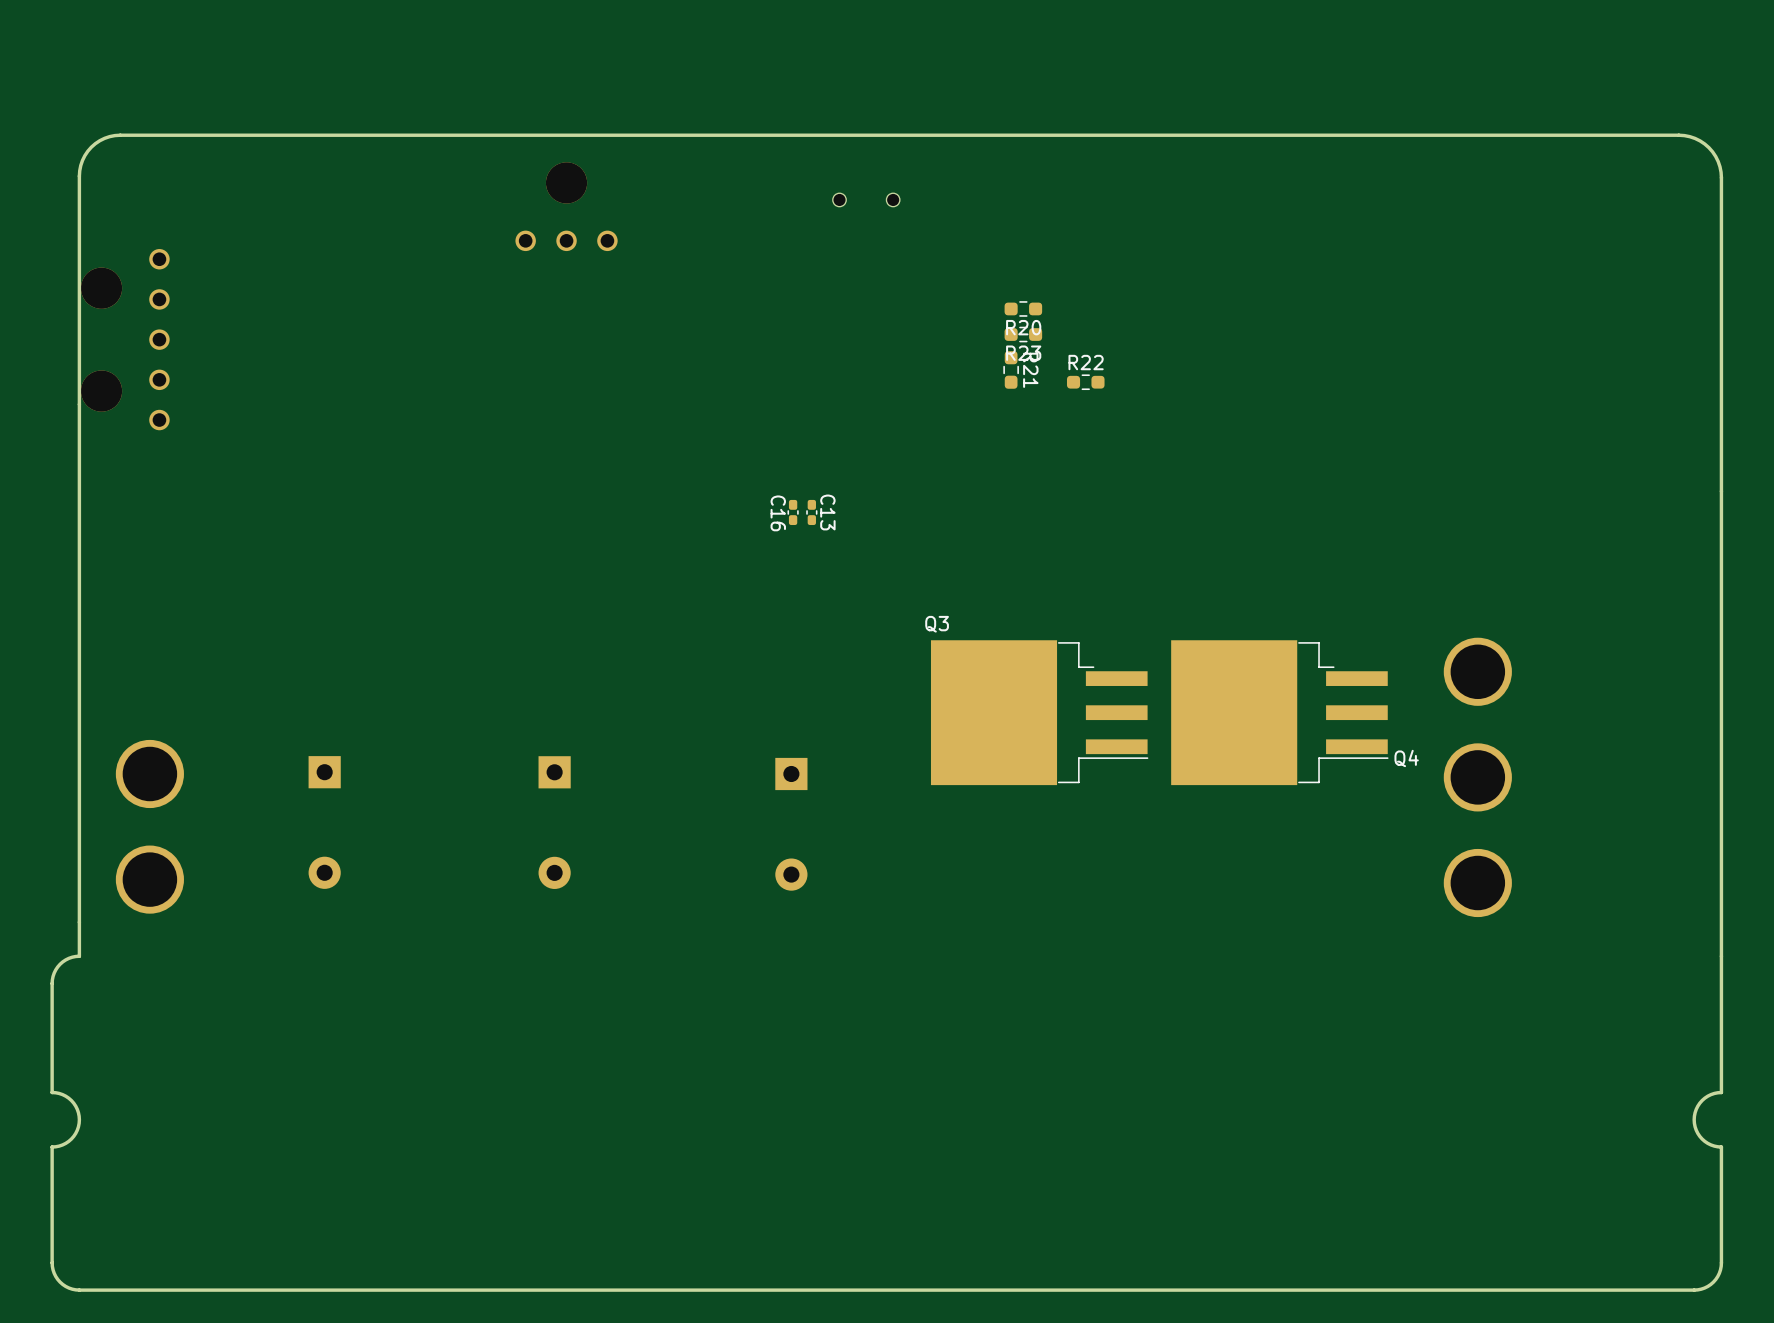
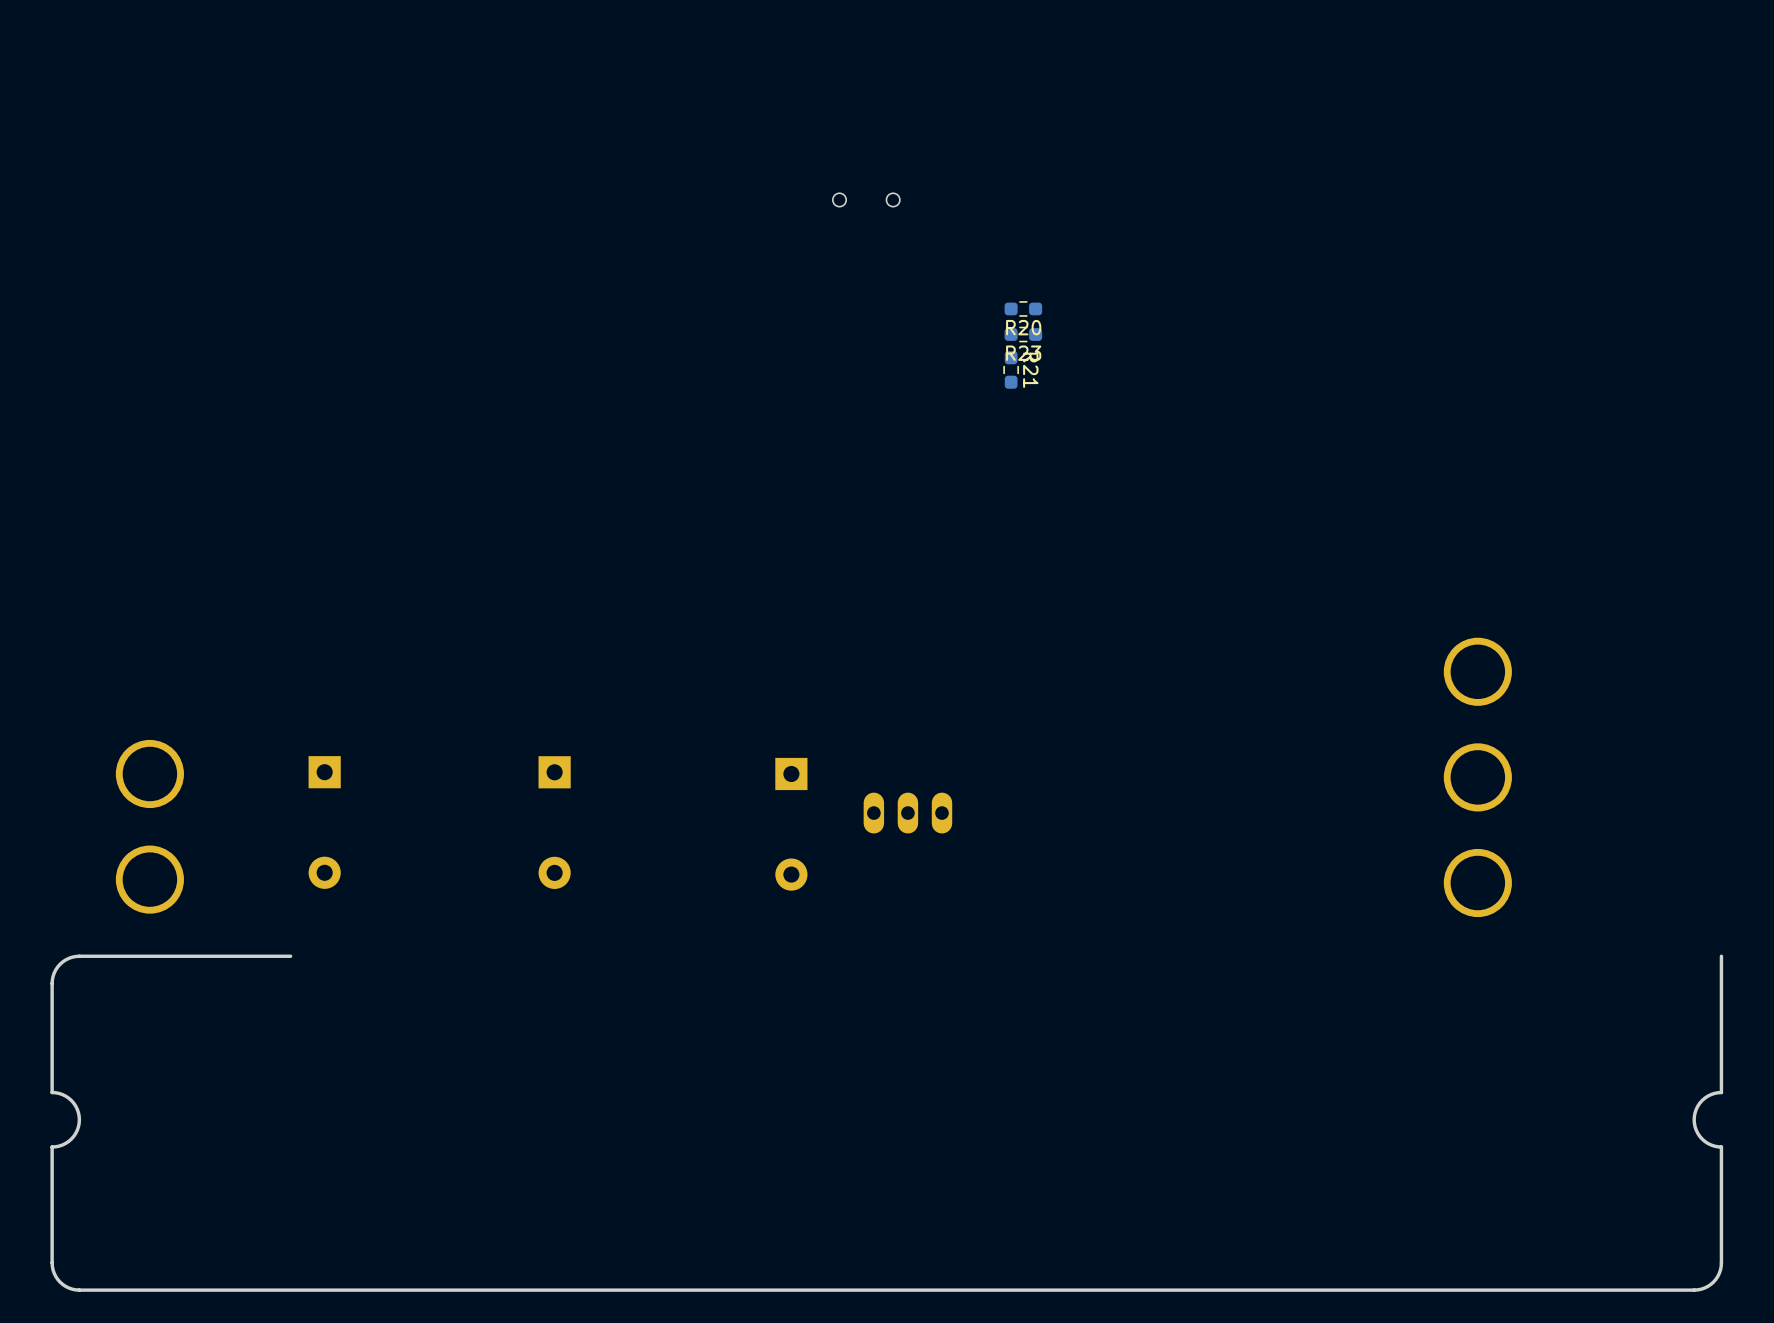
part: (566, 206) -> none
part: (125, 339) -> none
R22: (1085, 382) -> none
C16: (793, 512) -> none
C13: (811, 512) -> none
Q3: (1039, 712) -> none
Q4: (1279, 712) -> none
part: none -> (907, 813)
board edge: (1721, 956) (1721, 177) (1718, 161) (1708, 147) (1695, 138) (1678, 135) (120, 135) (99, 140) (84, 155) (79, 176) (79, 956) -> (290, 956) (79, 956)

